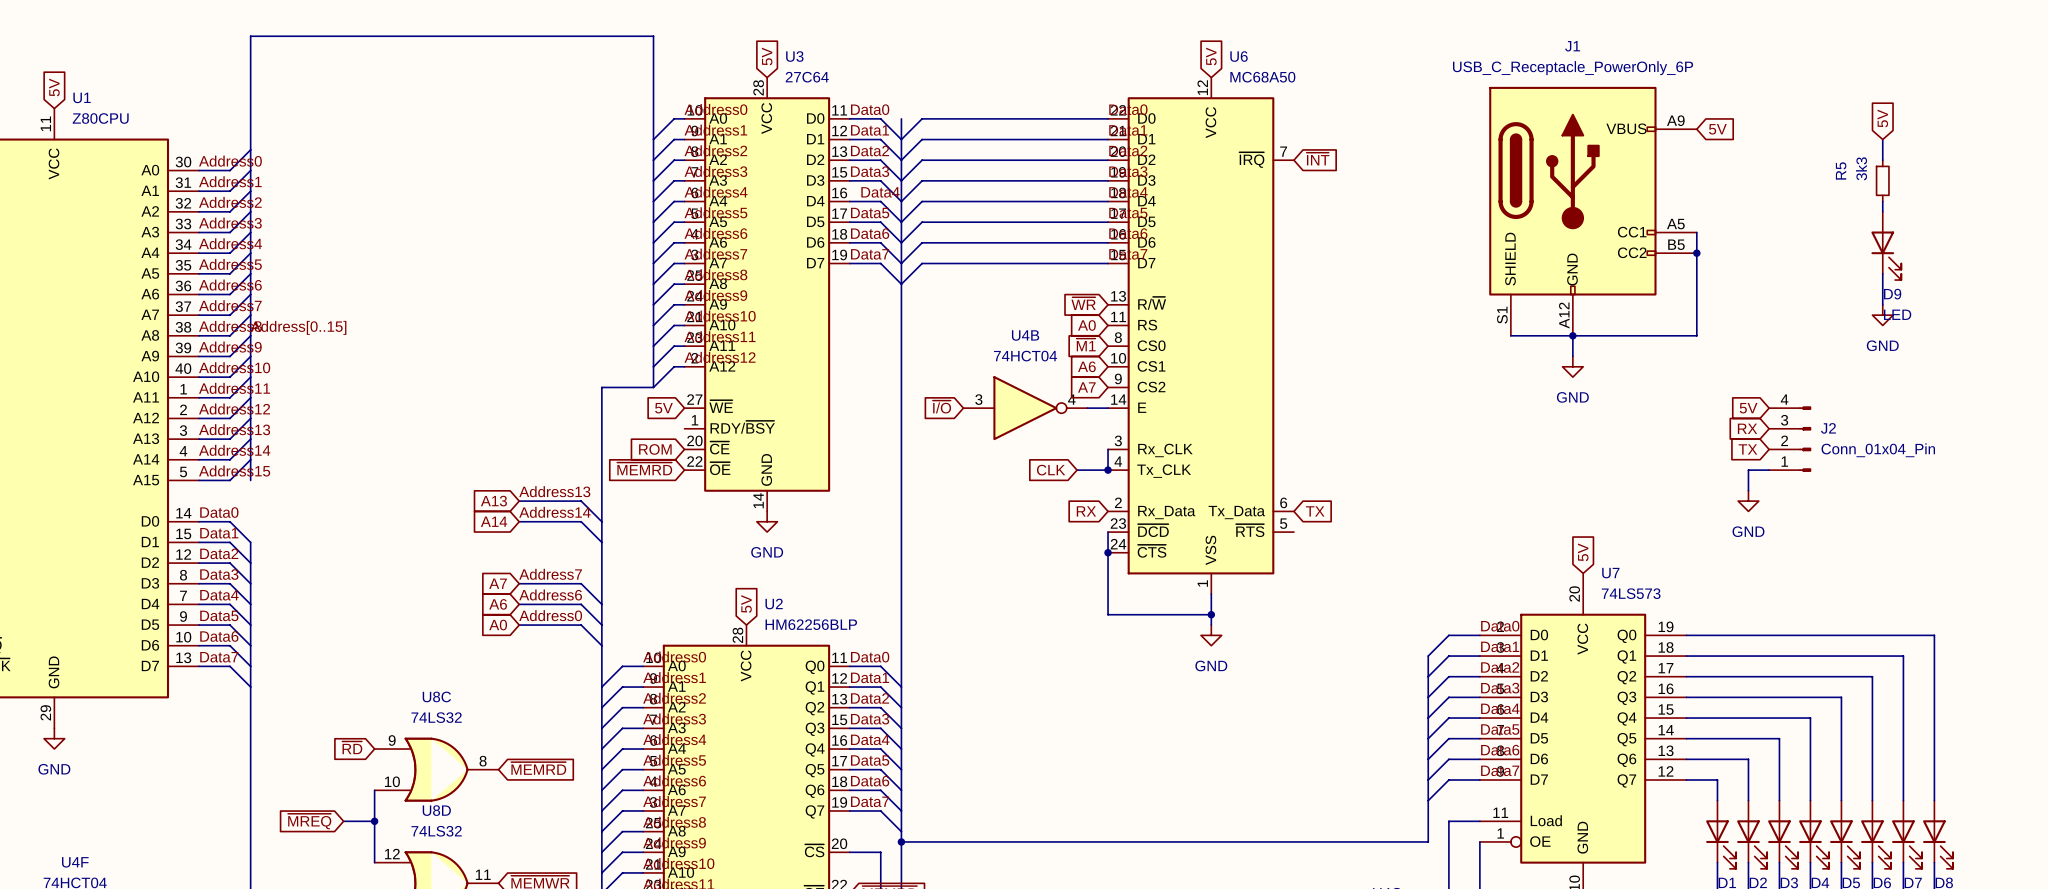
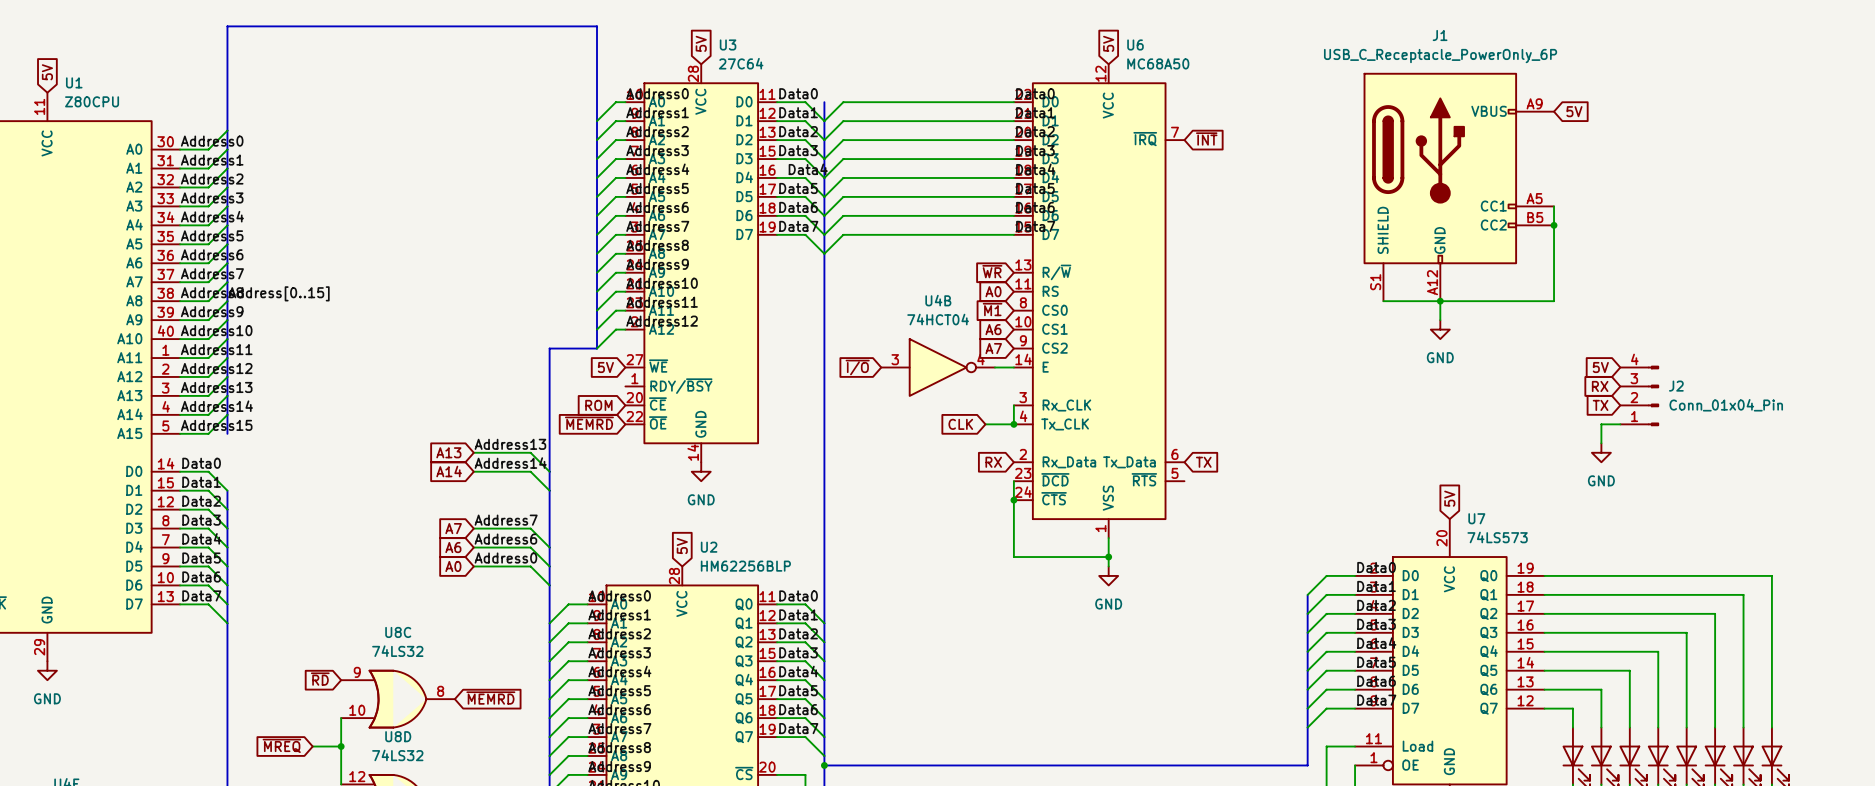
global label: 5V (1882, 118) -> none
wire: (1882, 139) (1882, 160) -> none
R5: 3k3 (1882, 180) -> none
wire: (1882, 201) (1882, 211) -> none
D9: LED (1886, 245) -> none
wire: (1882, 273) (1882, 304) -> none
power symbol: GND (1882, 315) -> none

